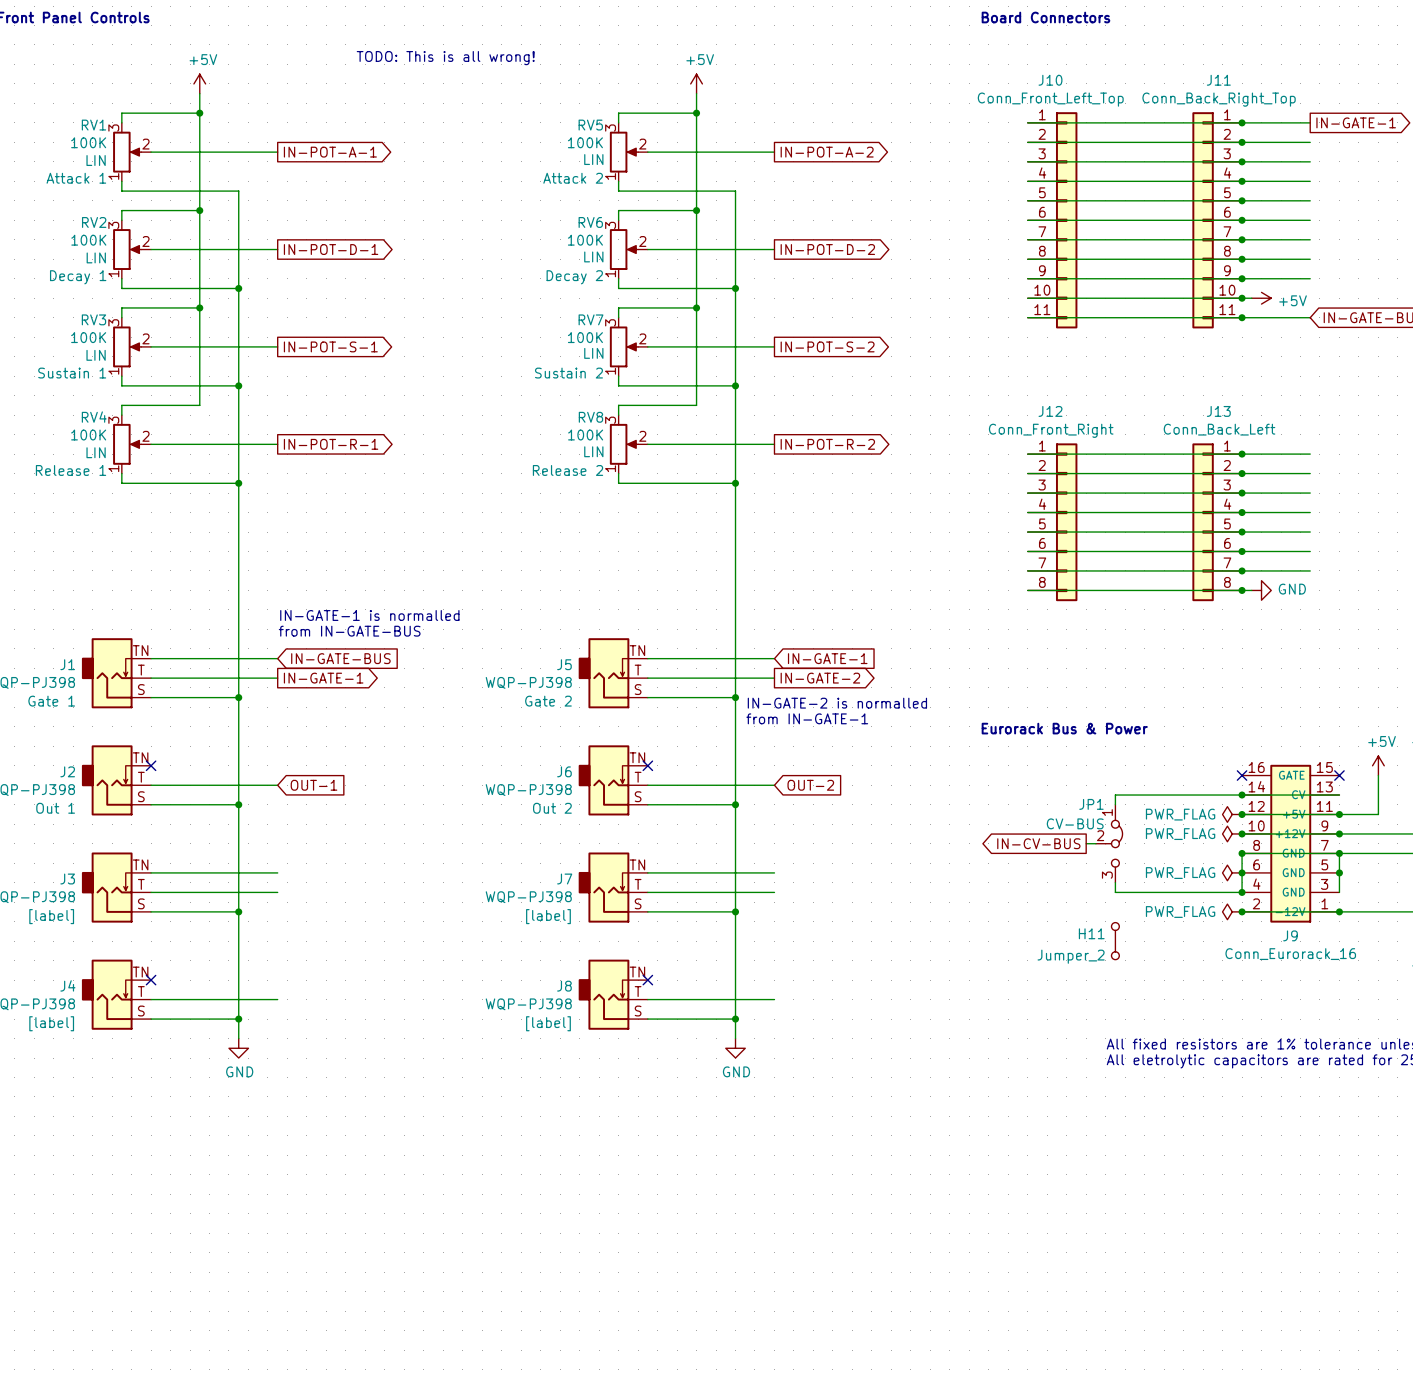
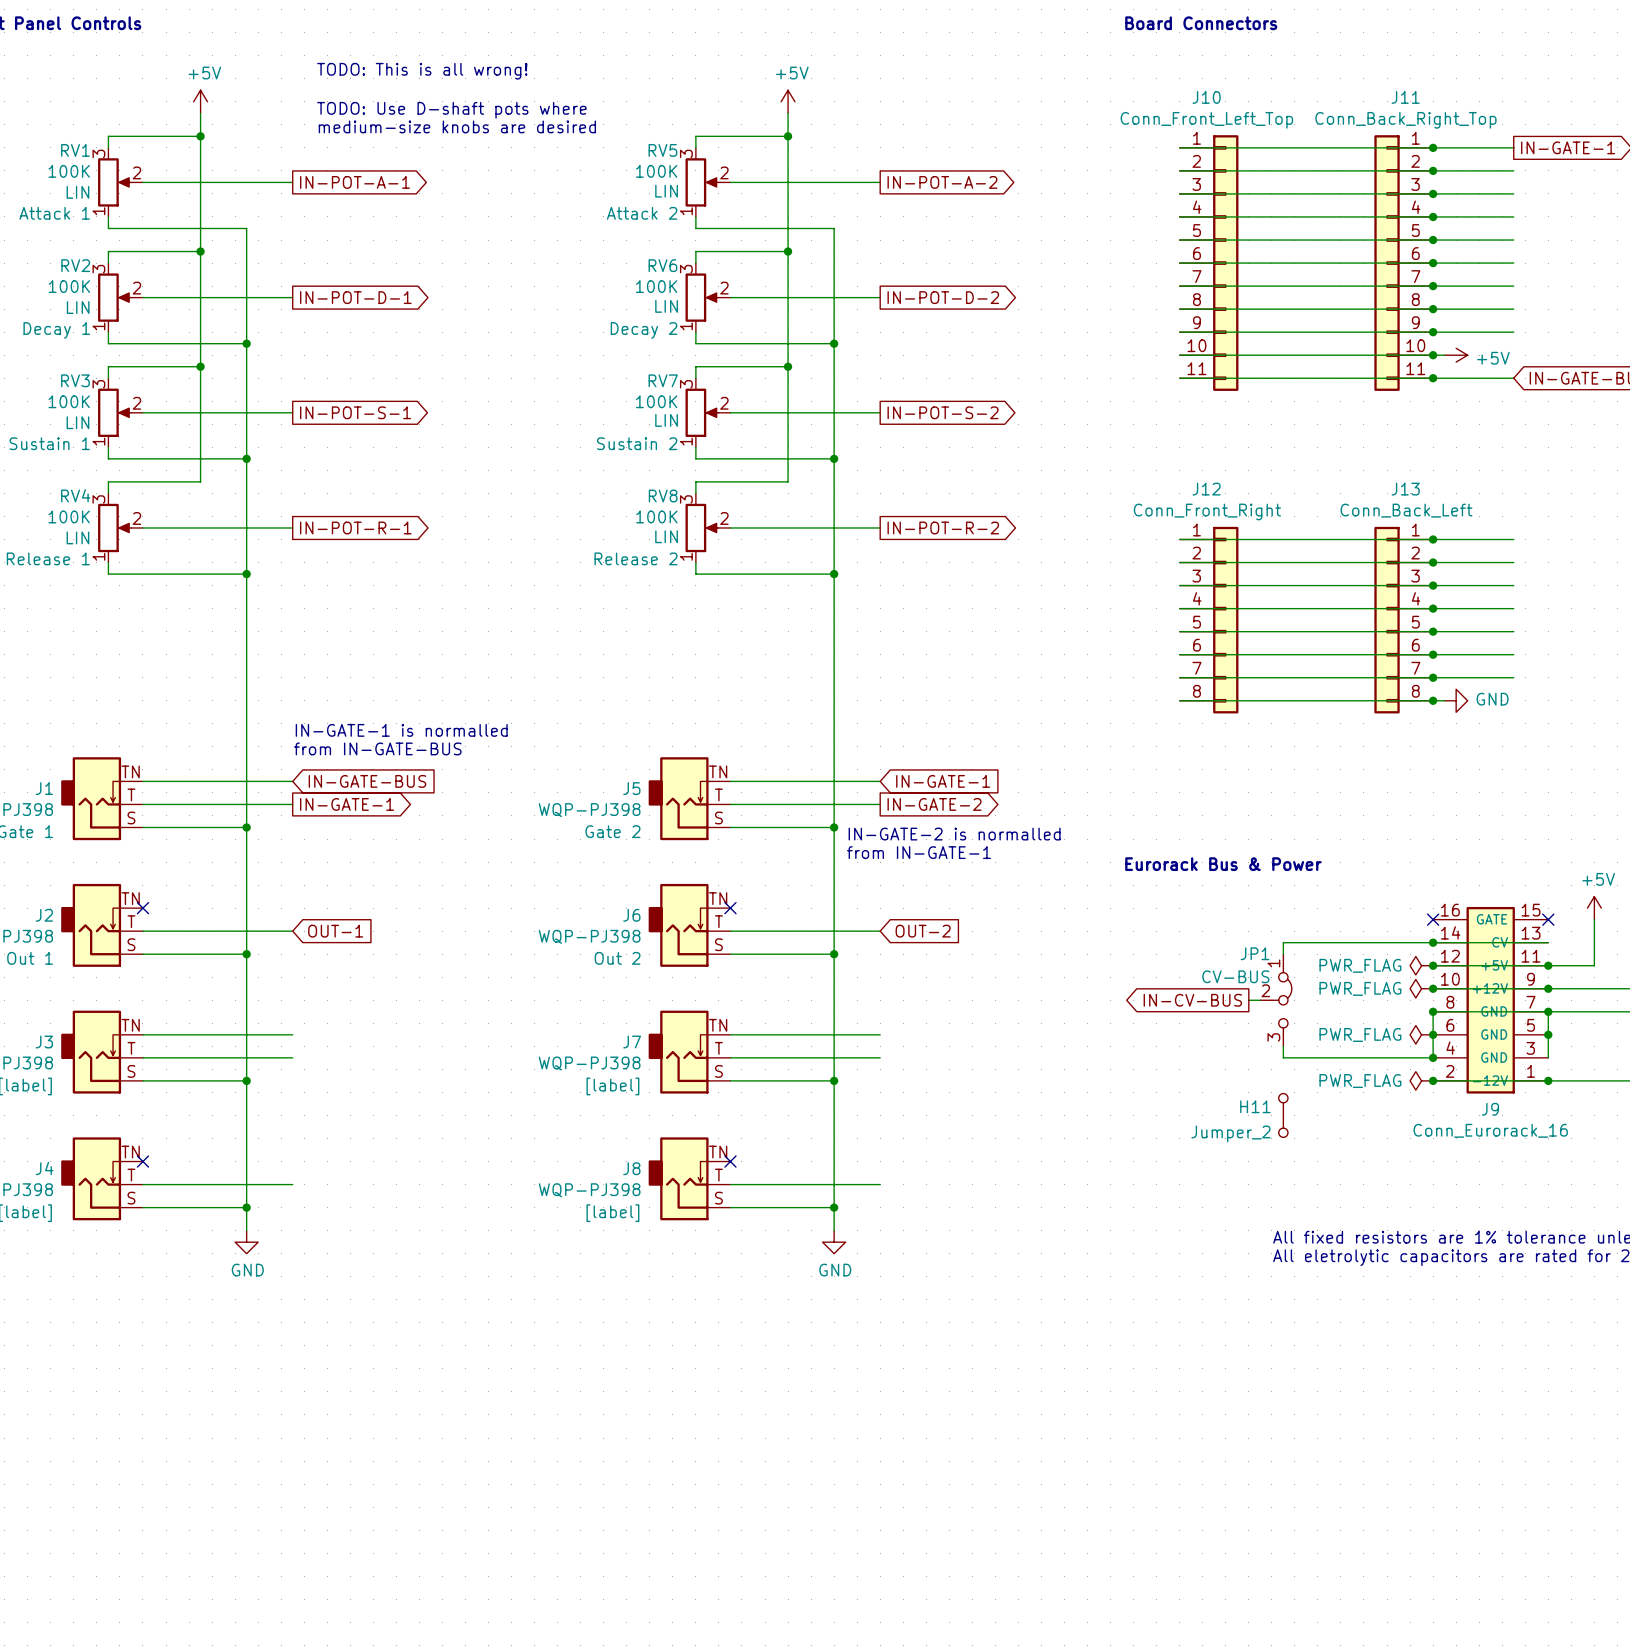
text position: TODO: This is all wrong! (445, 58) -> TODO: This is all wrong! (422, 71)
text: none -> TODO: Use D-shaft pots where (451, 110)
text: none -> medium-size knobs are desired (457, 126)

